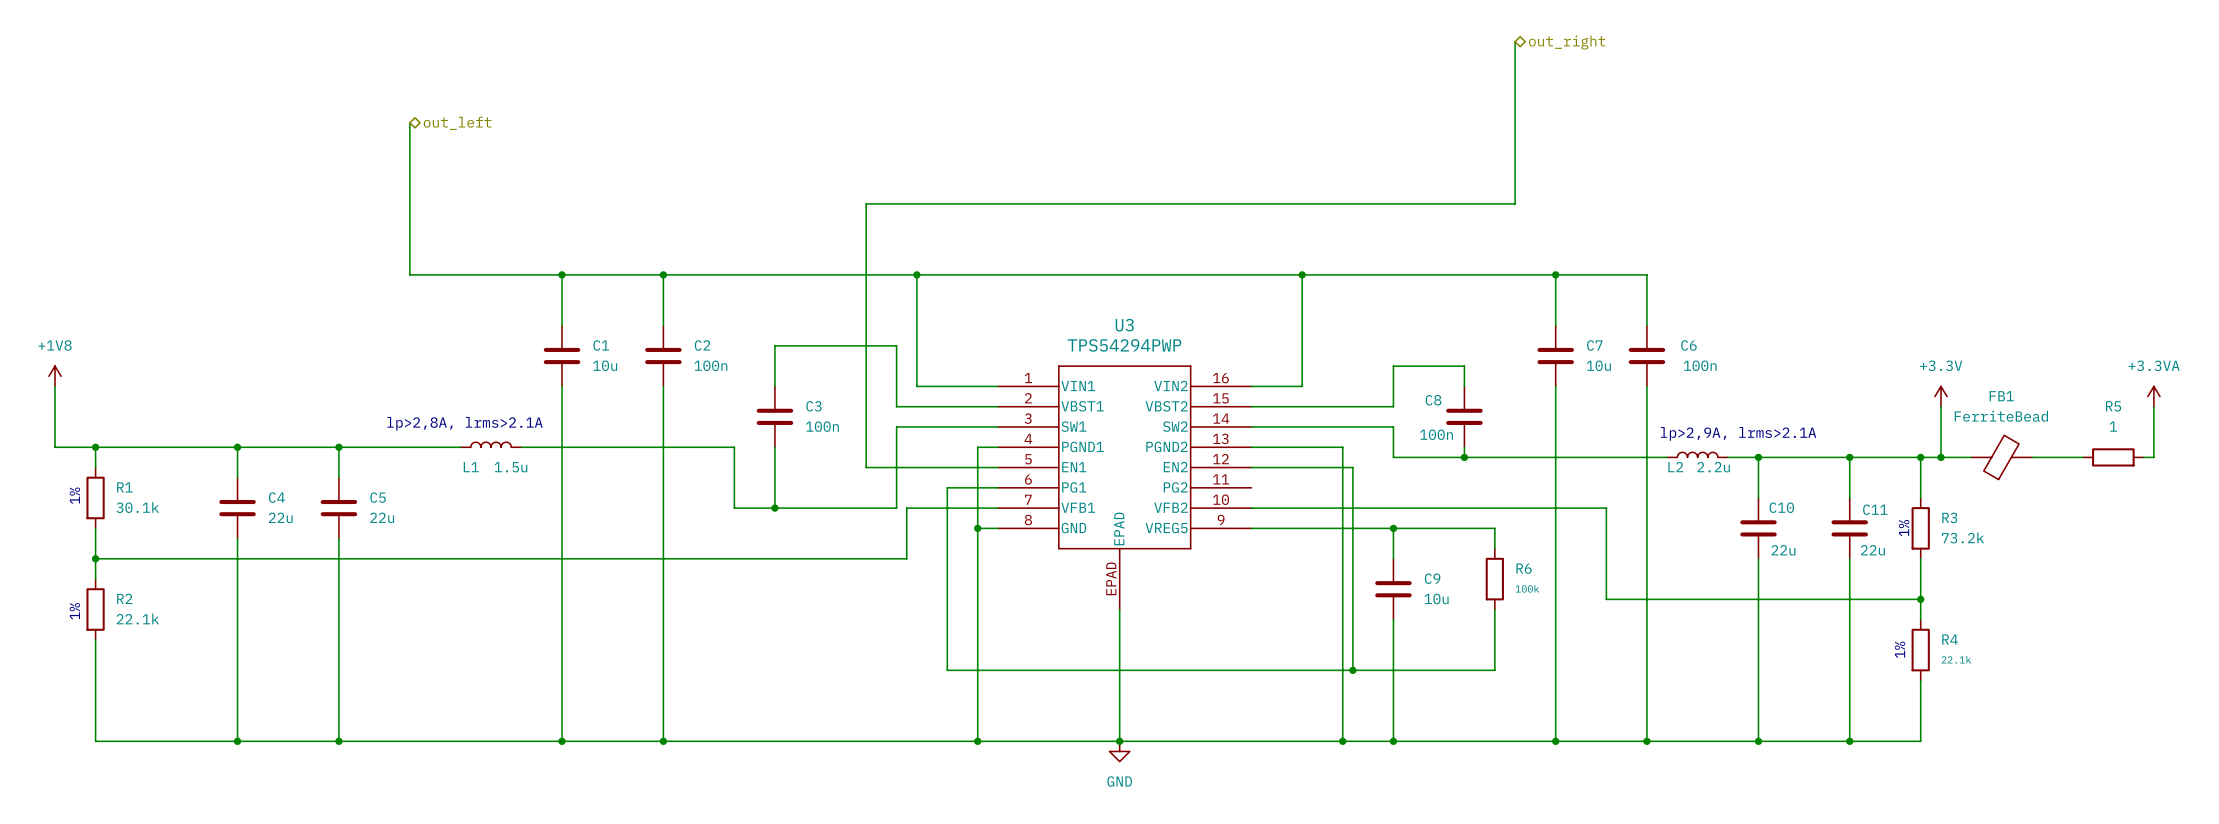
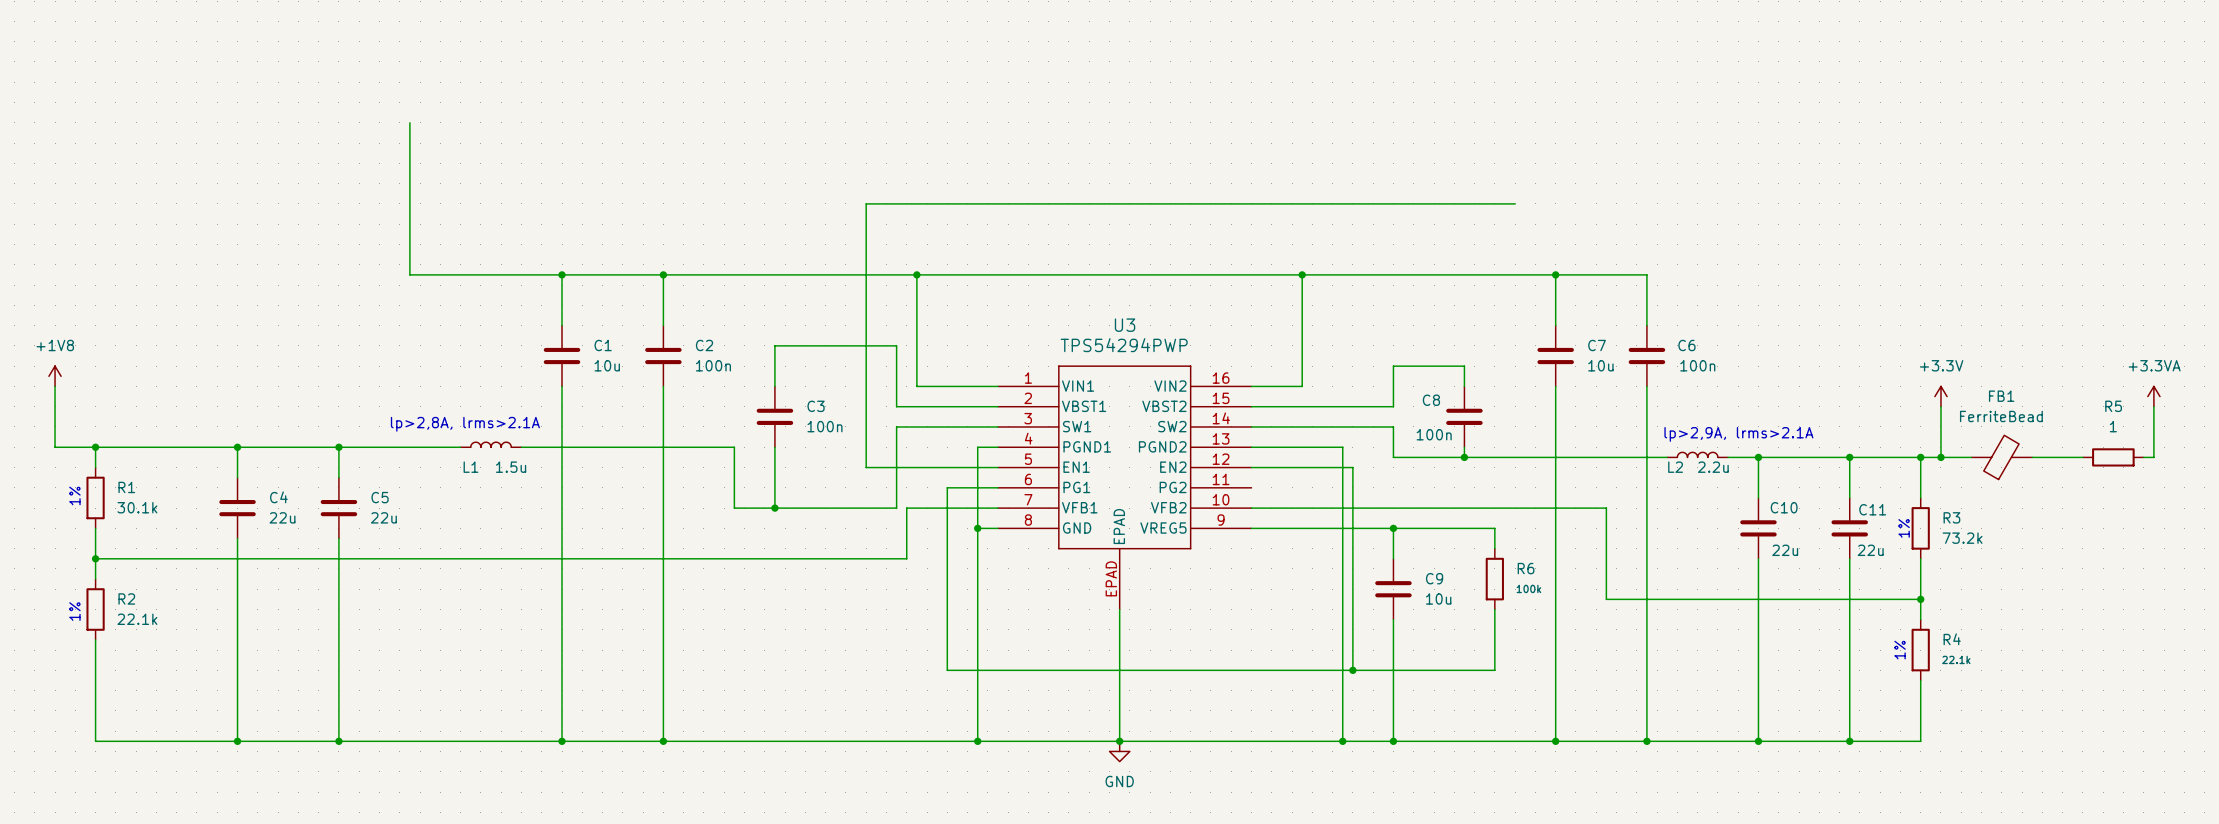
wire: (1515, 41) (1515, 203) -> none
hierarchical label: out_right (1567, 42) -> none
hierarchical label: out_left (457, 123) -> none

